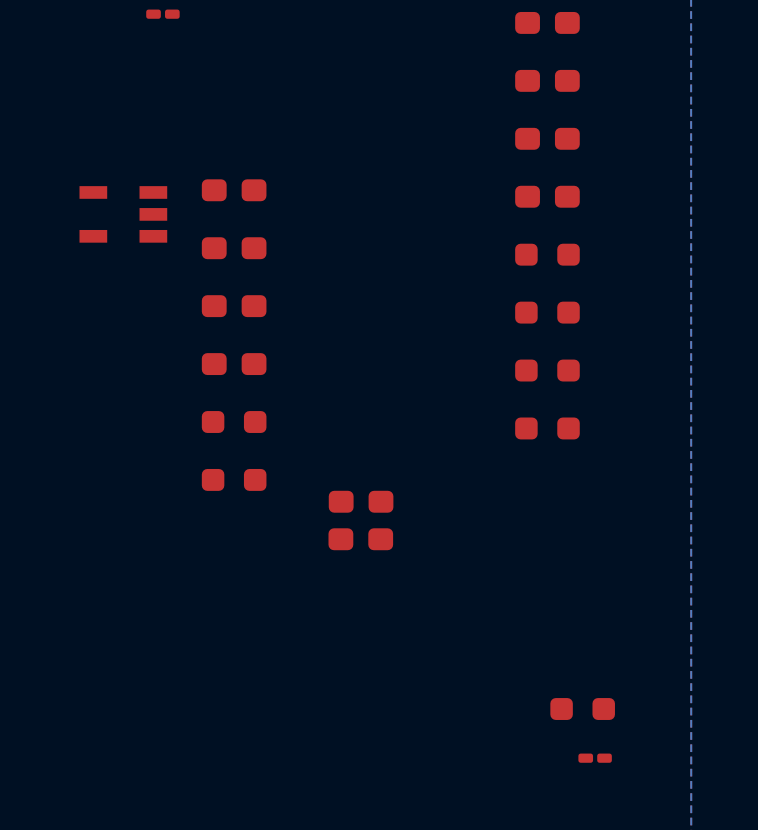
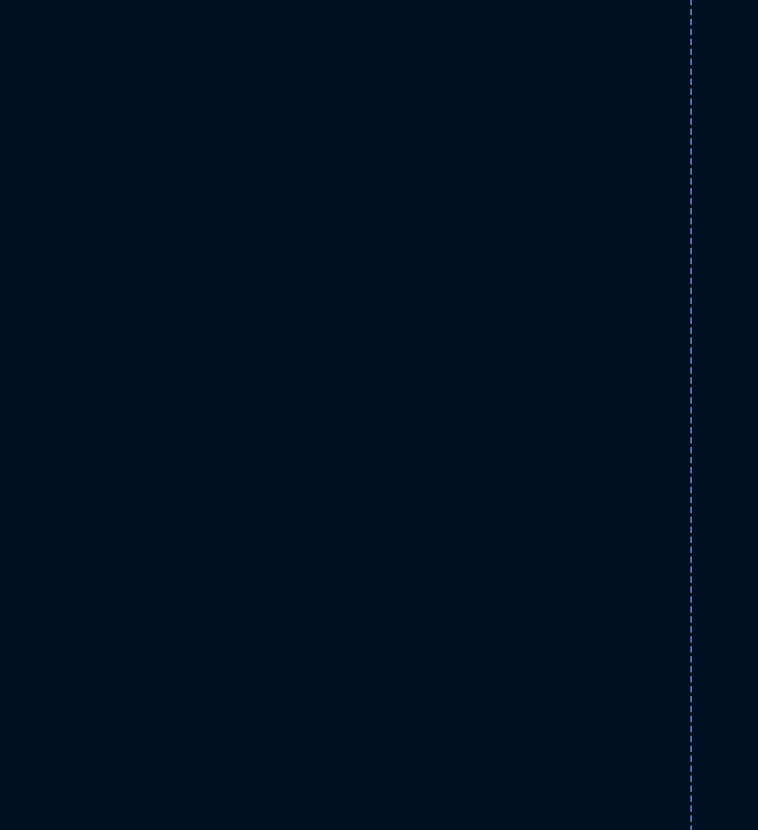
part: (162, 14) -> none
part: (547, 22) -> none
part: (547, 80) -> none
part: (547, 138) -> none
part: (234, 190) -> none
part: (547, 196) -> none
part: (123, 214) -> none
part: (234, 248) -> none
part: (547, 254) -> none
part: (234, 306) -> none
part: (547, 312) -> none
part: (234, 364) -> none
part: (547, 370) -> none
part: (234, 422) -> none
part: (547, 428) -> none
part: (234, 479) -> none
part: (361, 501) -> none
part: (360, 539) -> none
part: (582, 709) -> none
part: (595, 758) -> none

